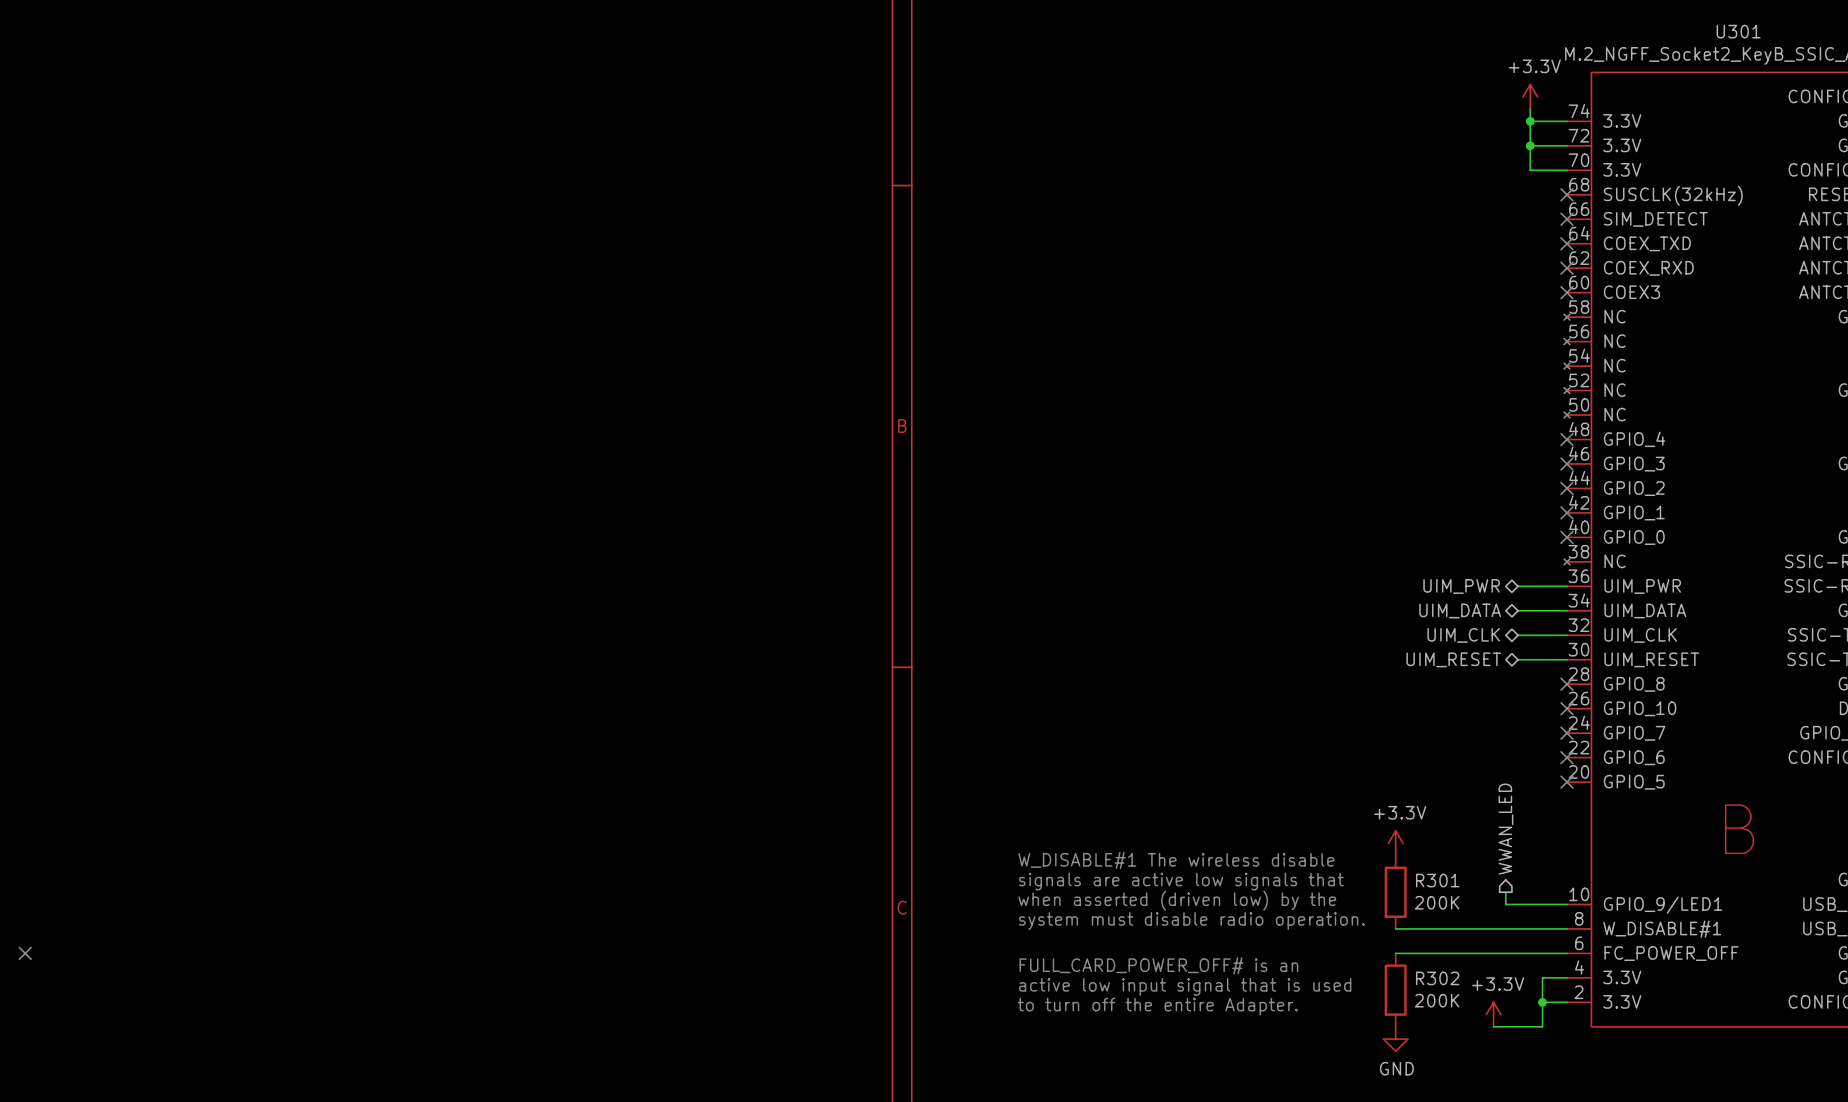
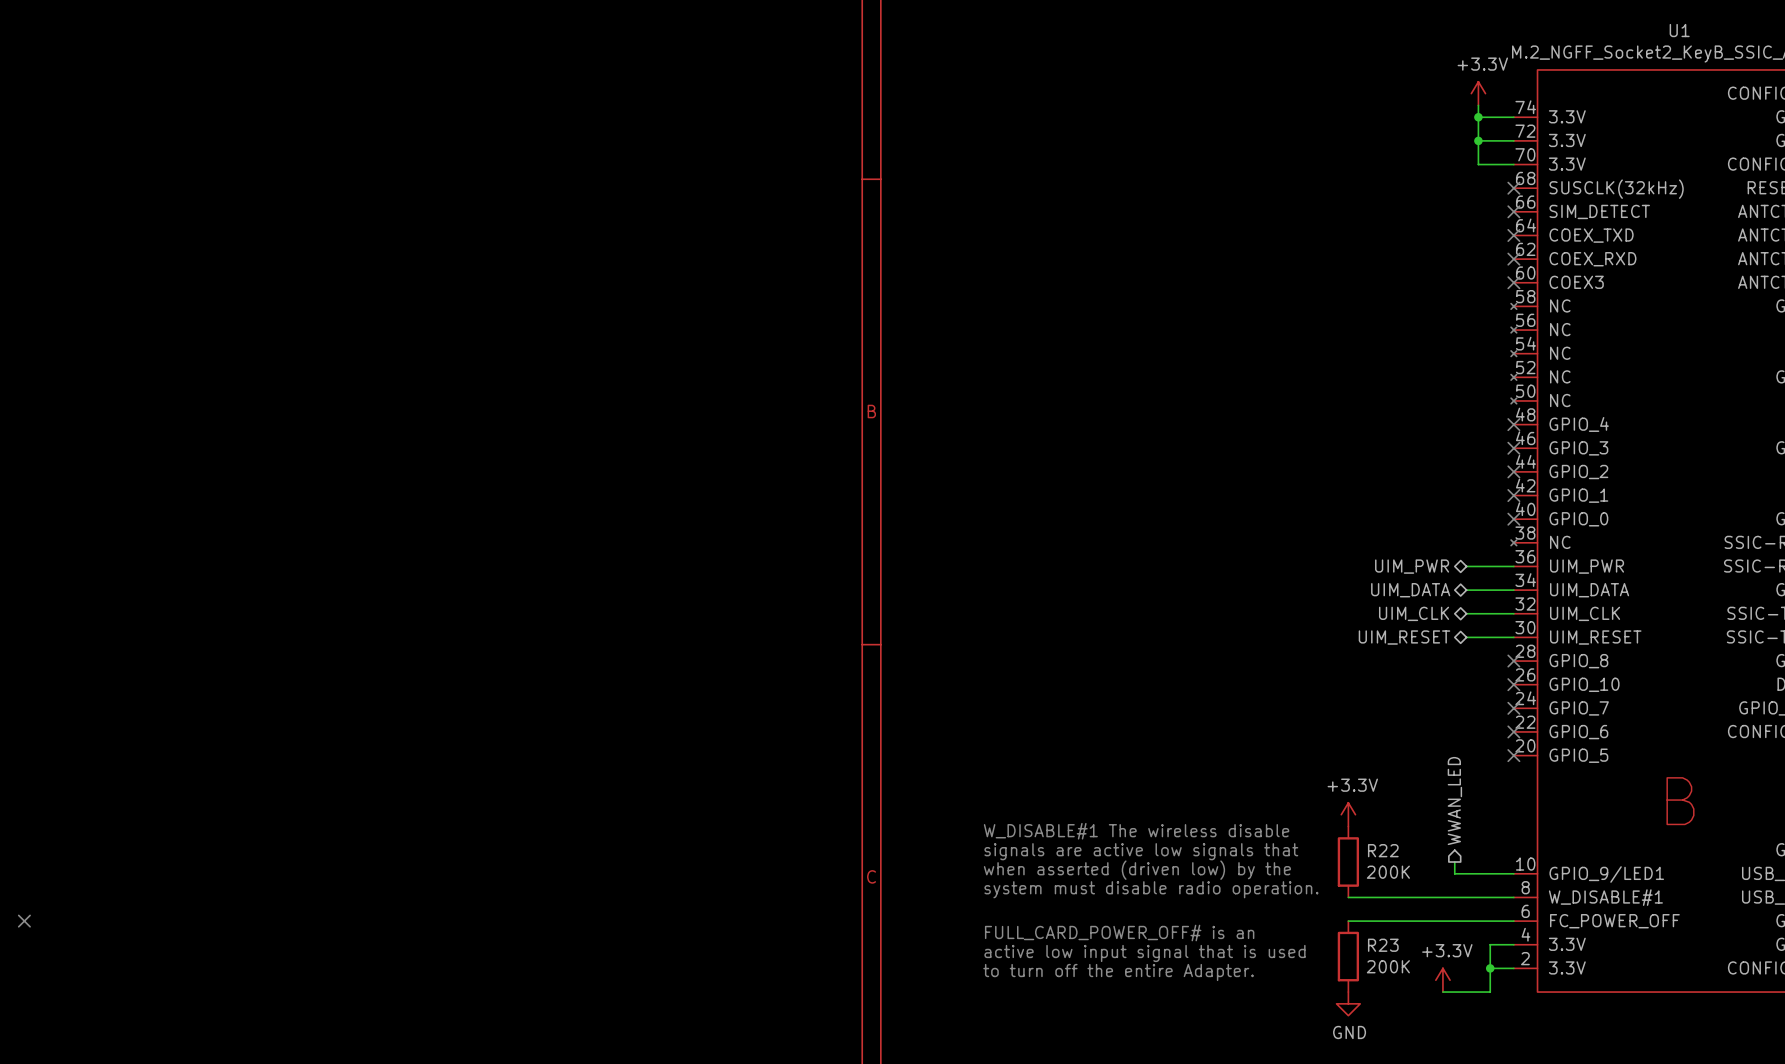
U301 name: U301 (1738, 31) -> U1 (1679, 30)
R301 name: R301 (1437, 880) -> R22 (1383, 850)
R302 name: R302 (1437, 978) -> R23 (1383, 945)

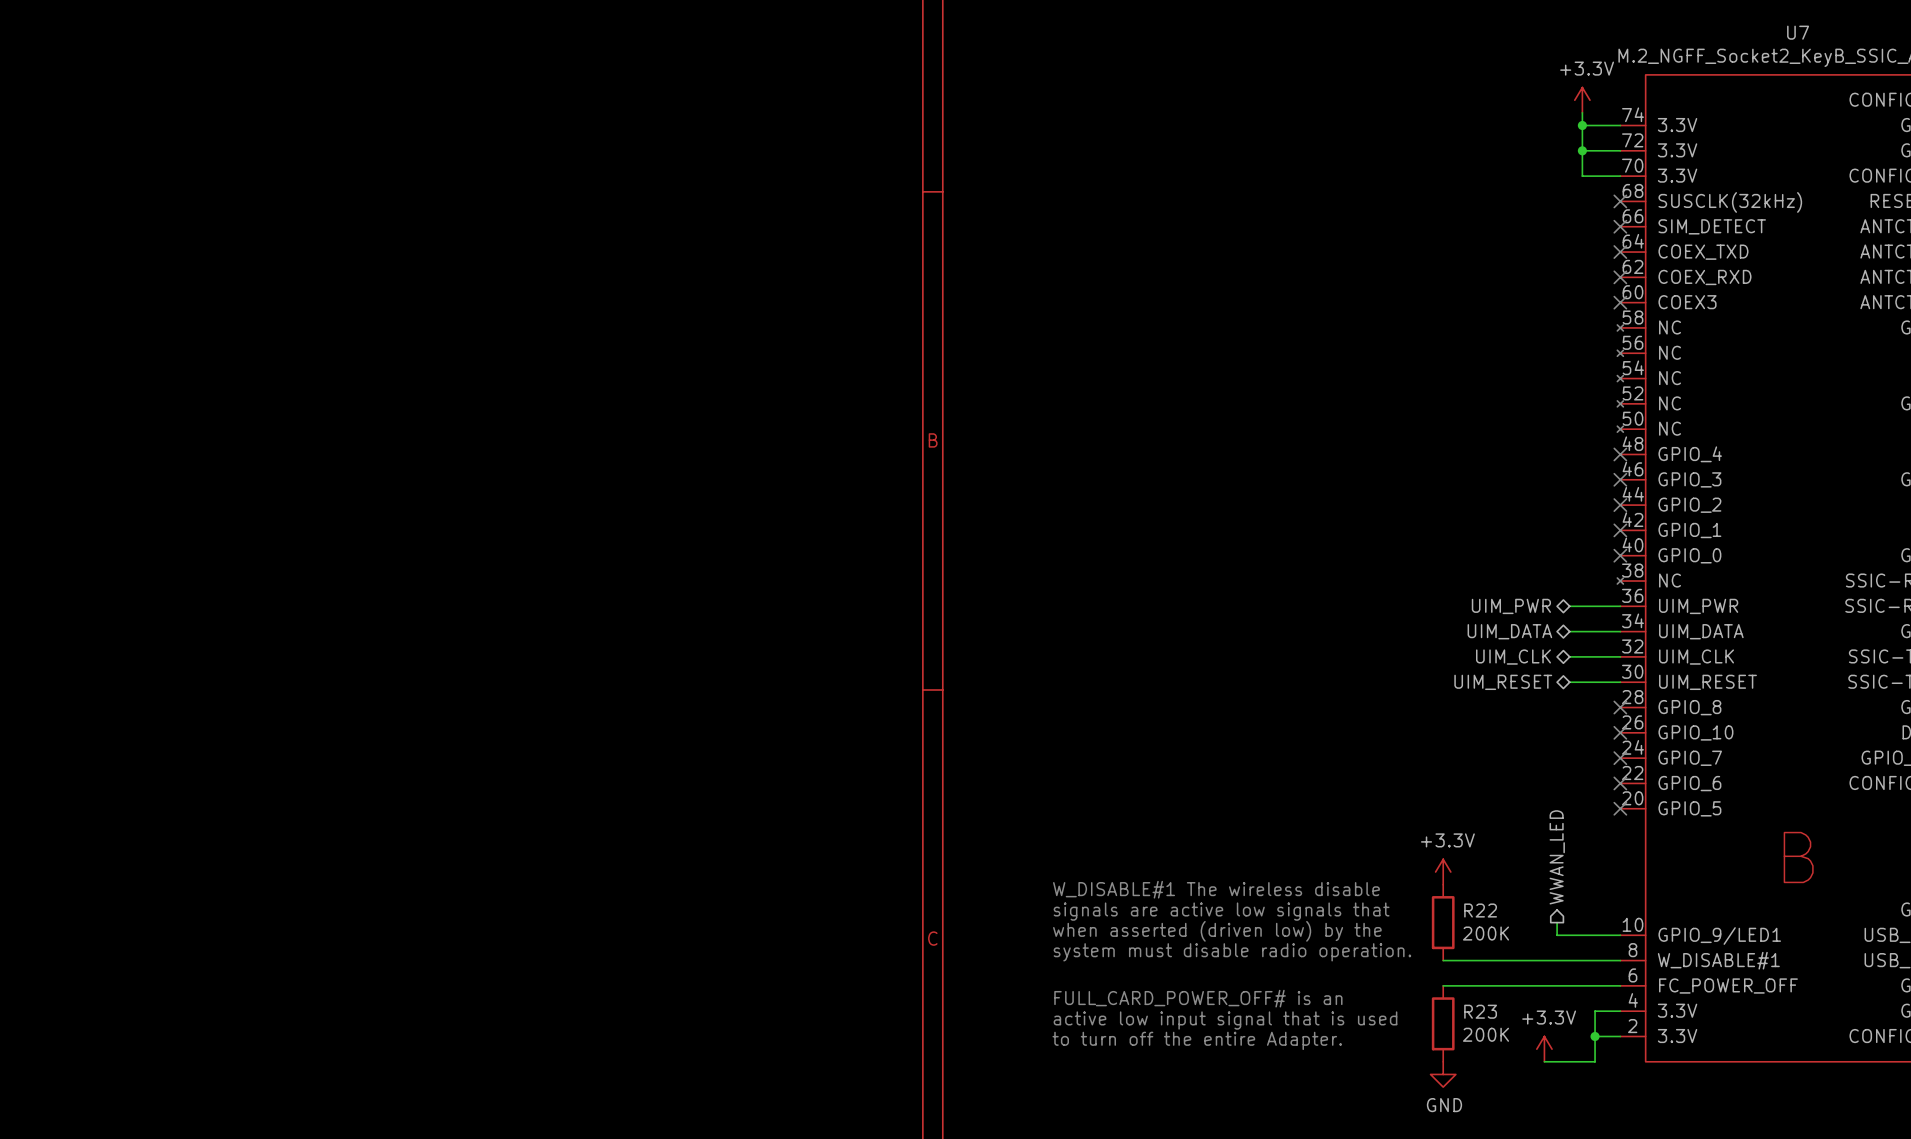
U1 name: U1 (1679, 30) -> U7 (1798, 32)
no-connect mark: (24, 921) -> none

